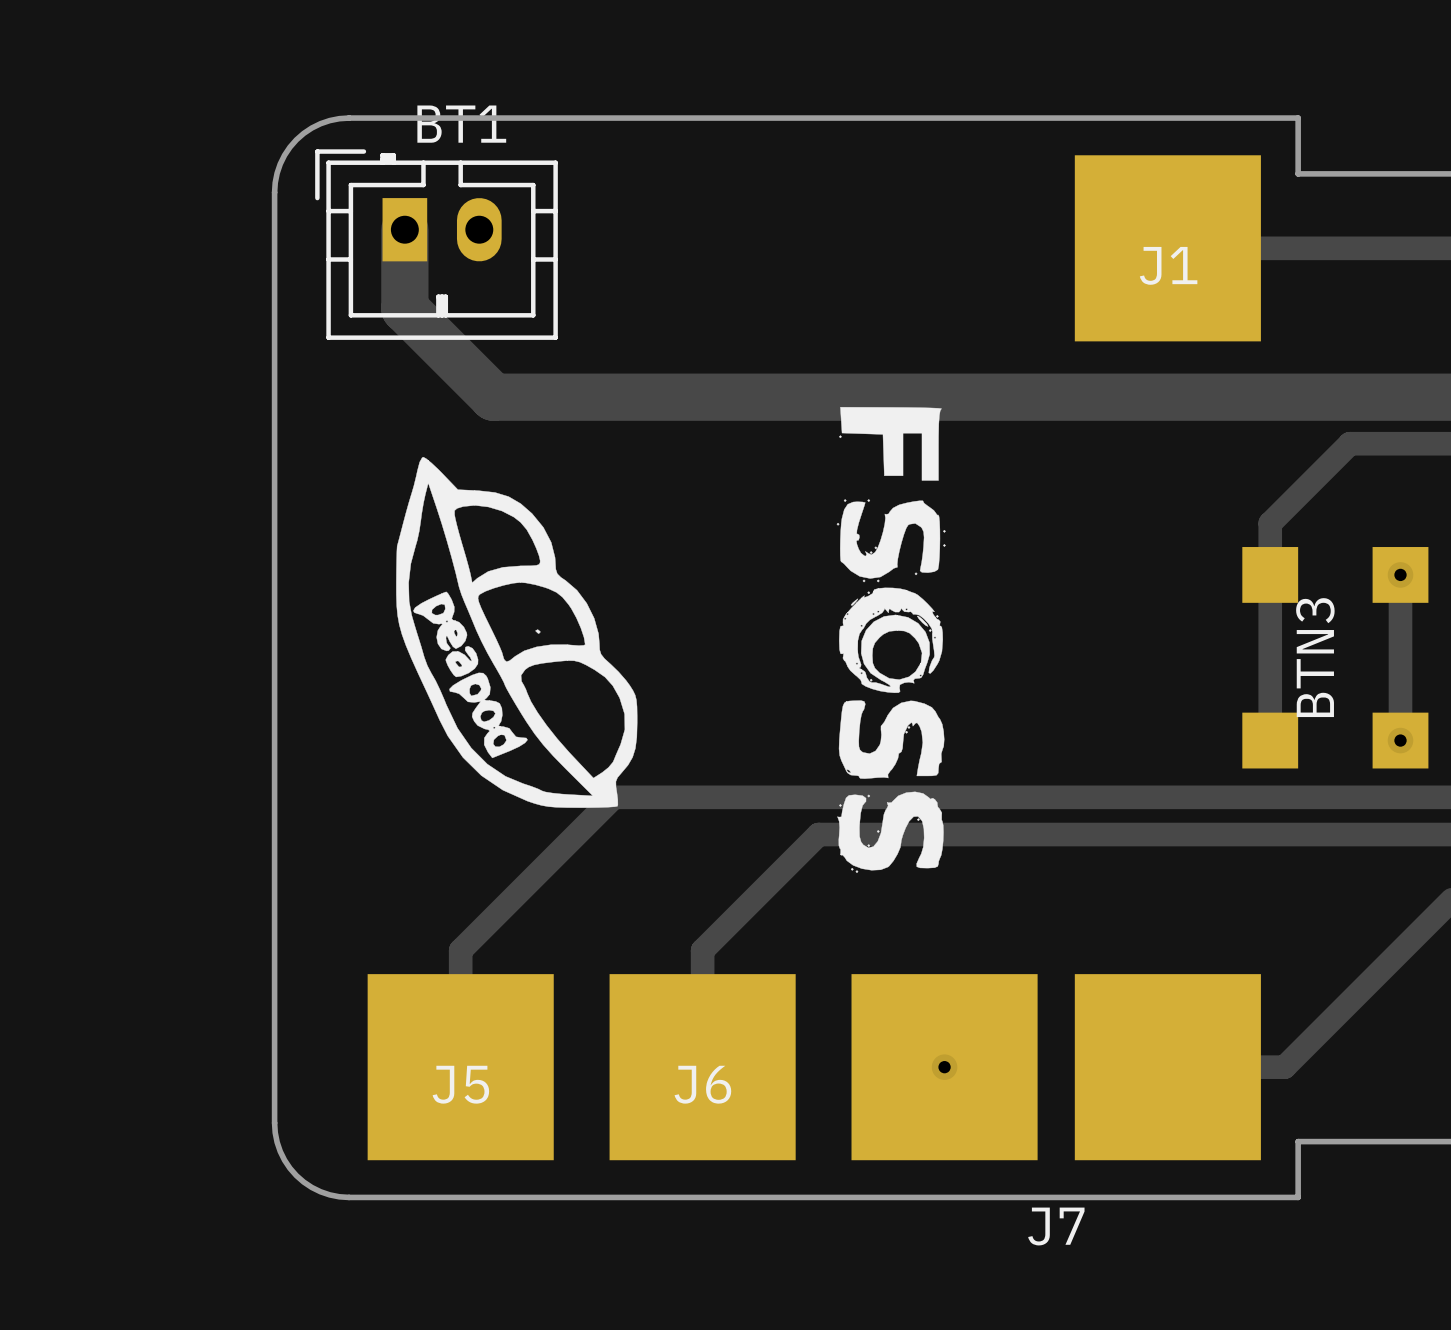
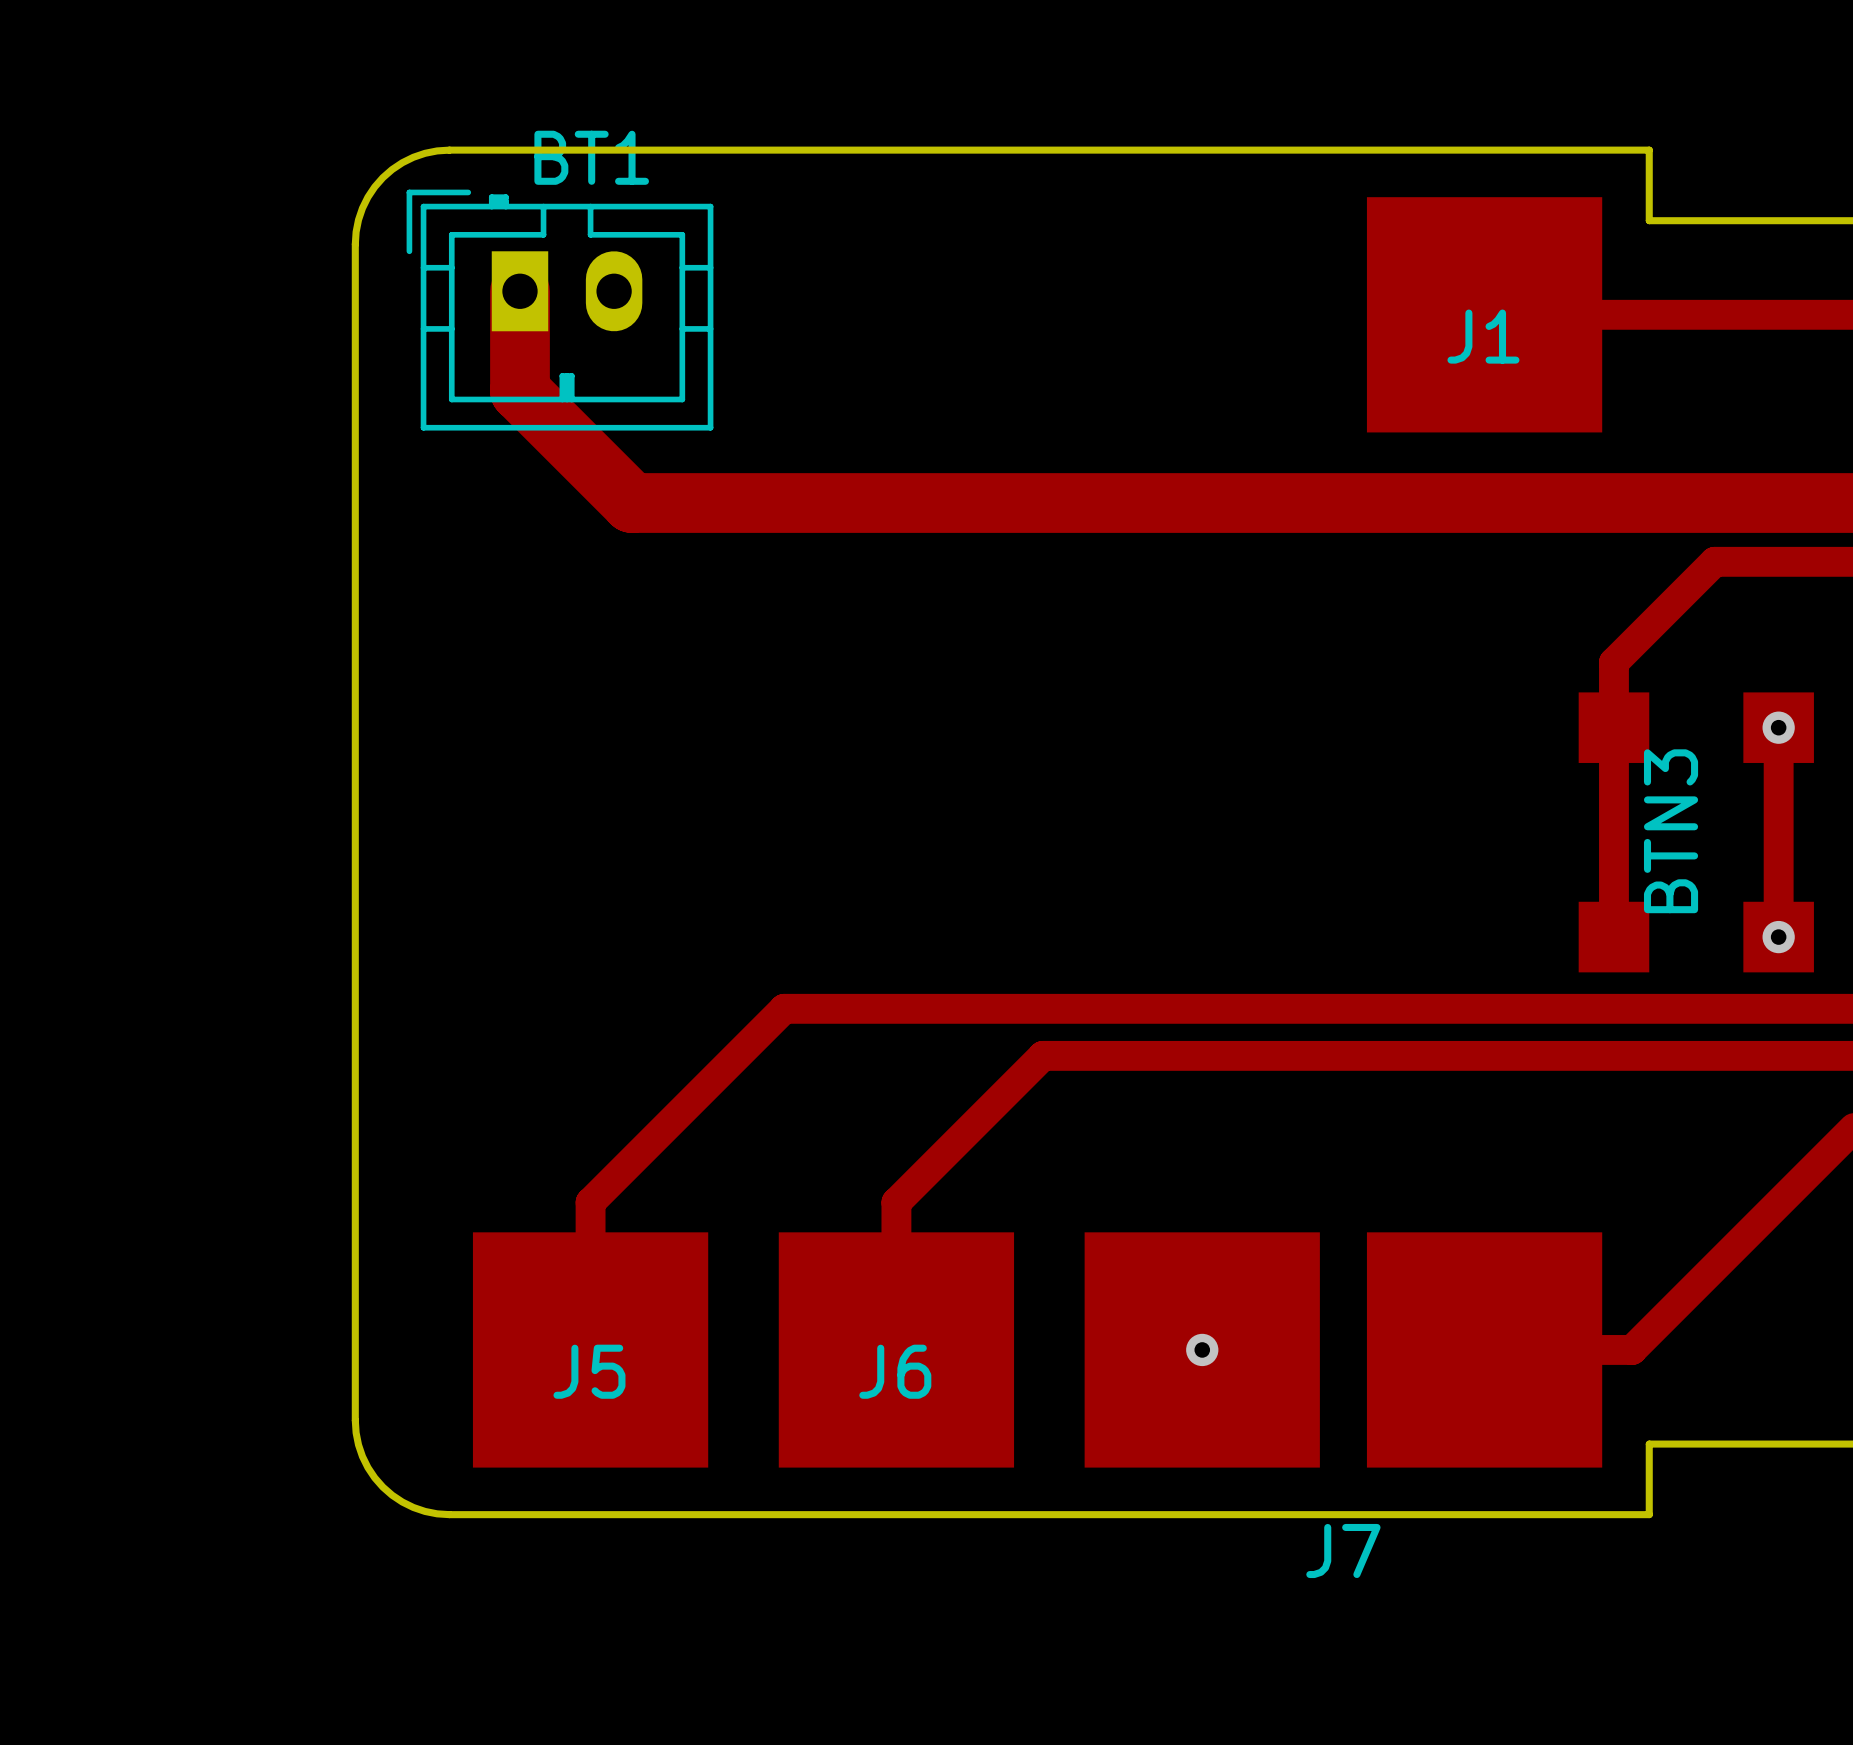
drawing: [836, 407, 946, 874] -> none
drawing: [396, 456, 638, 808] -> none

